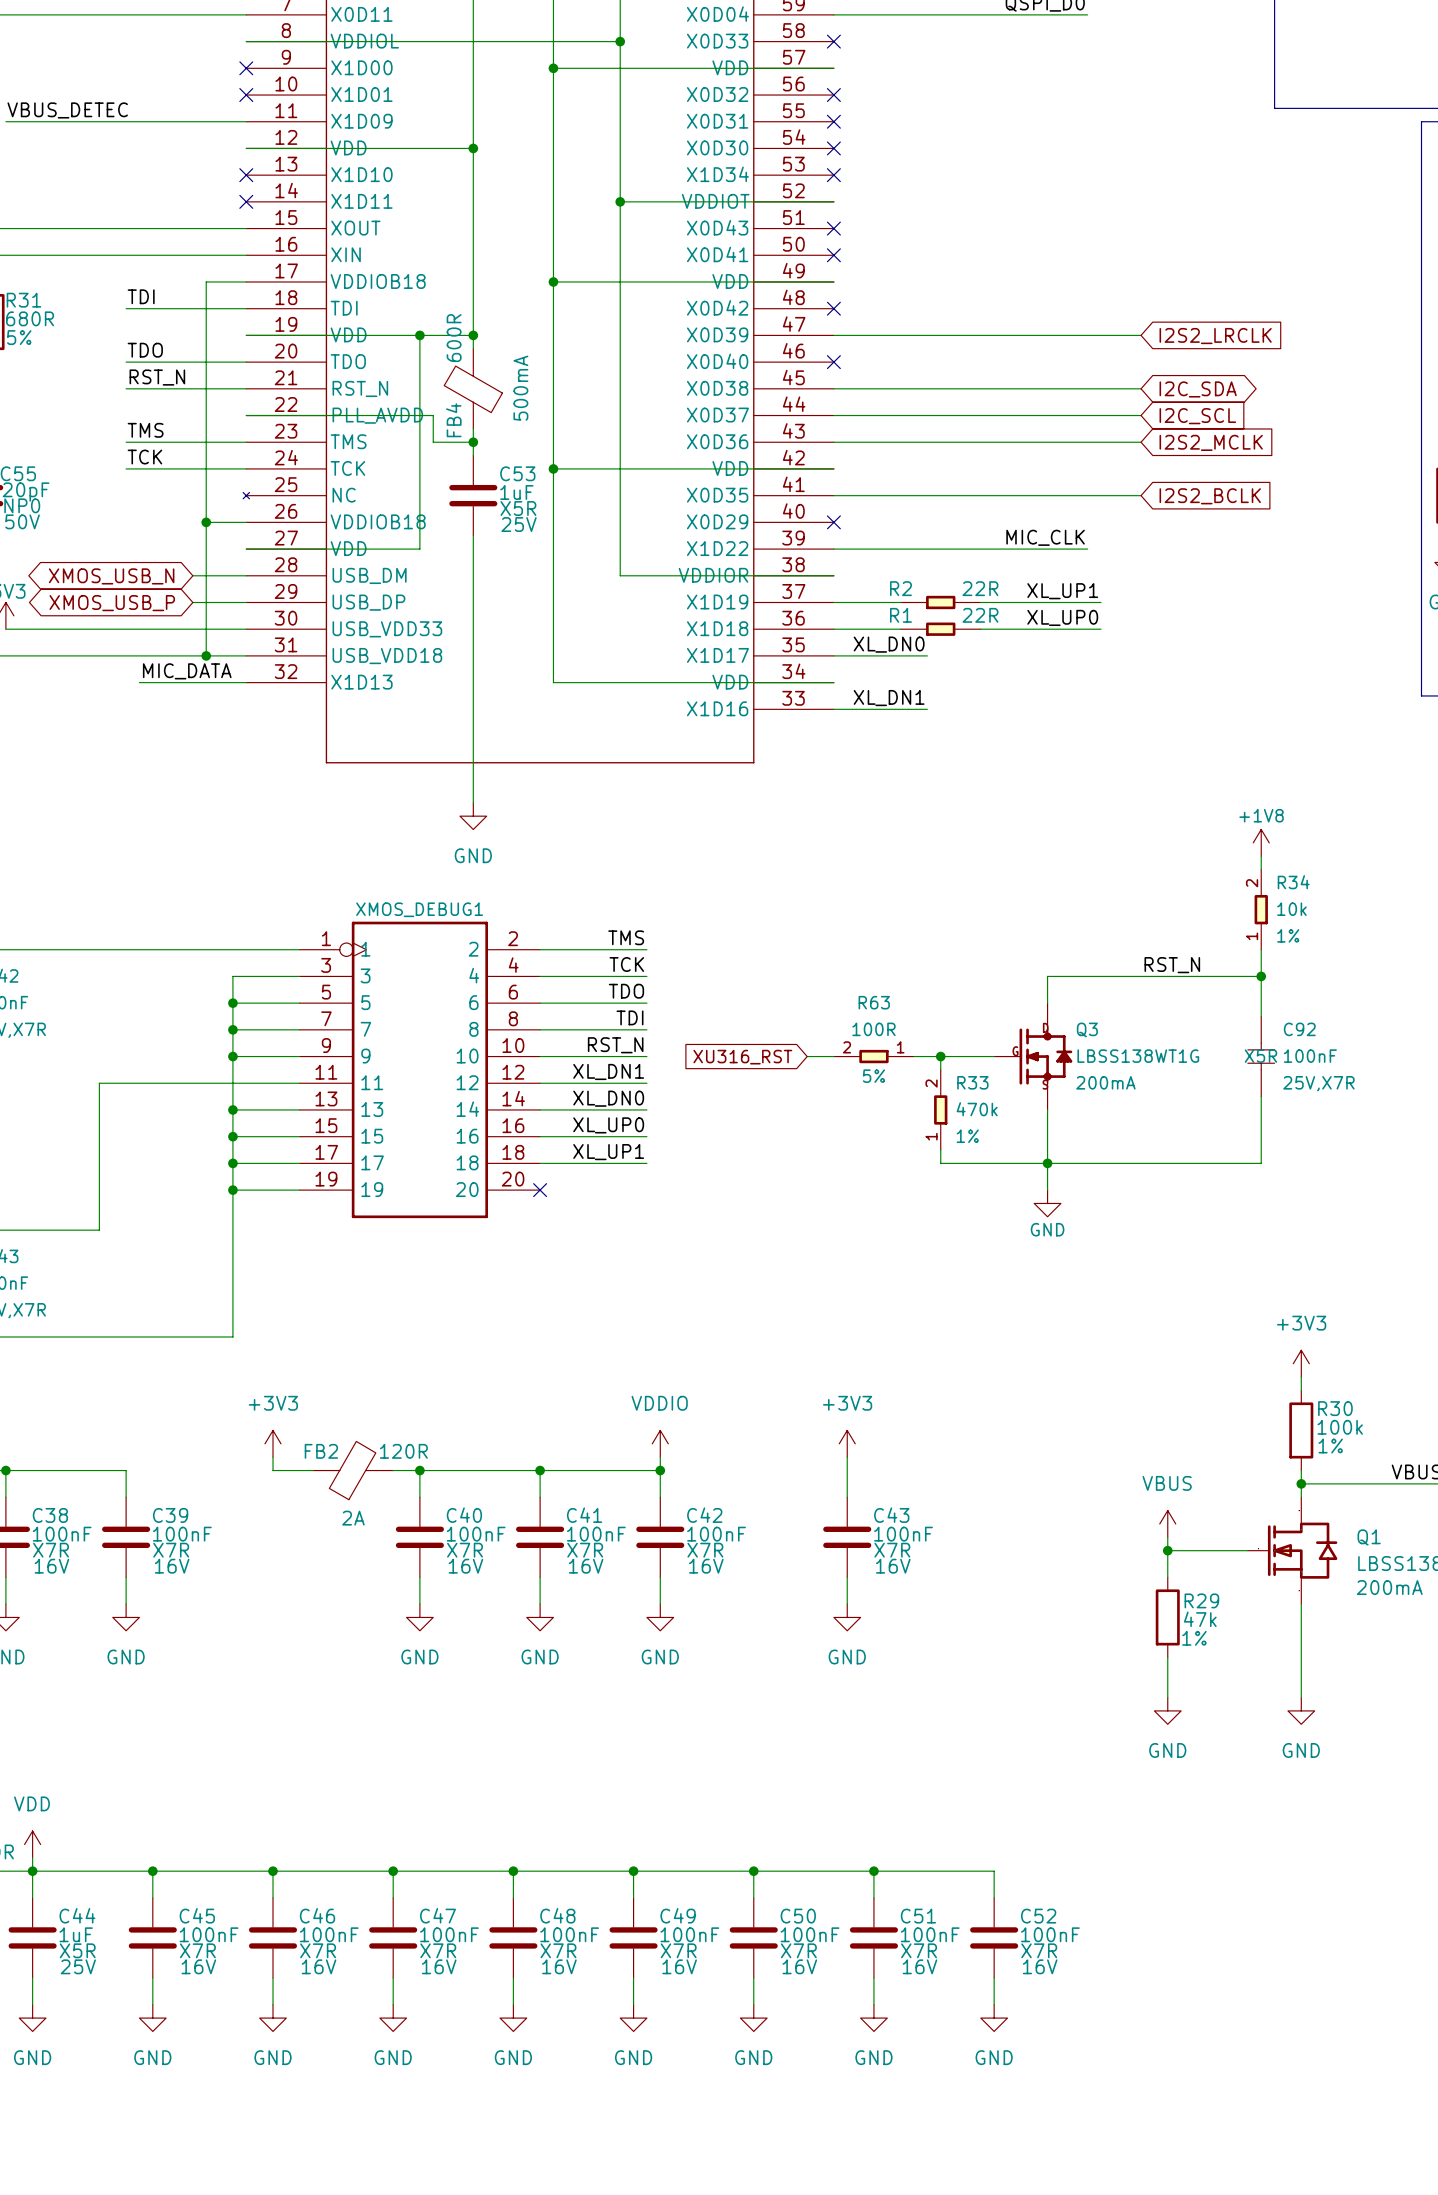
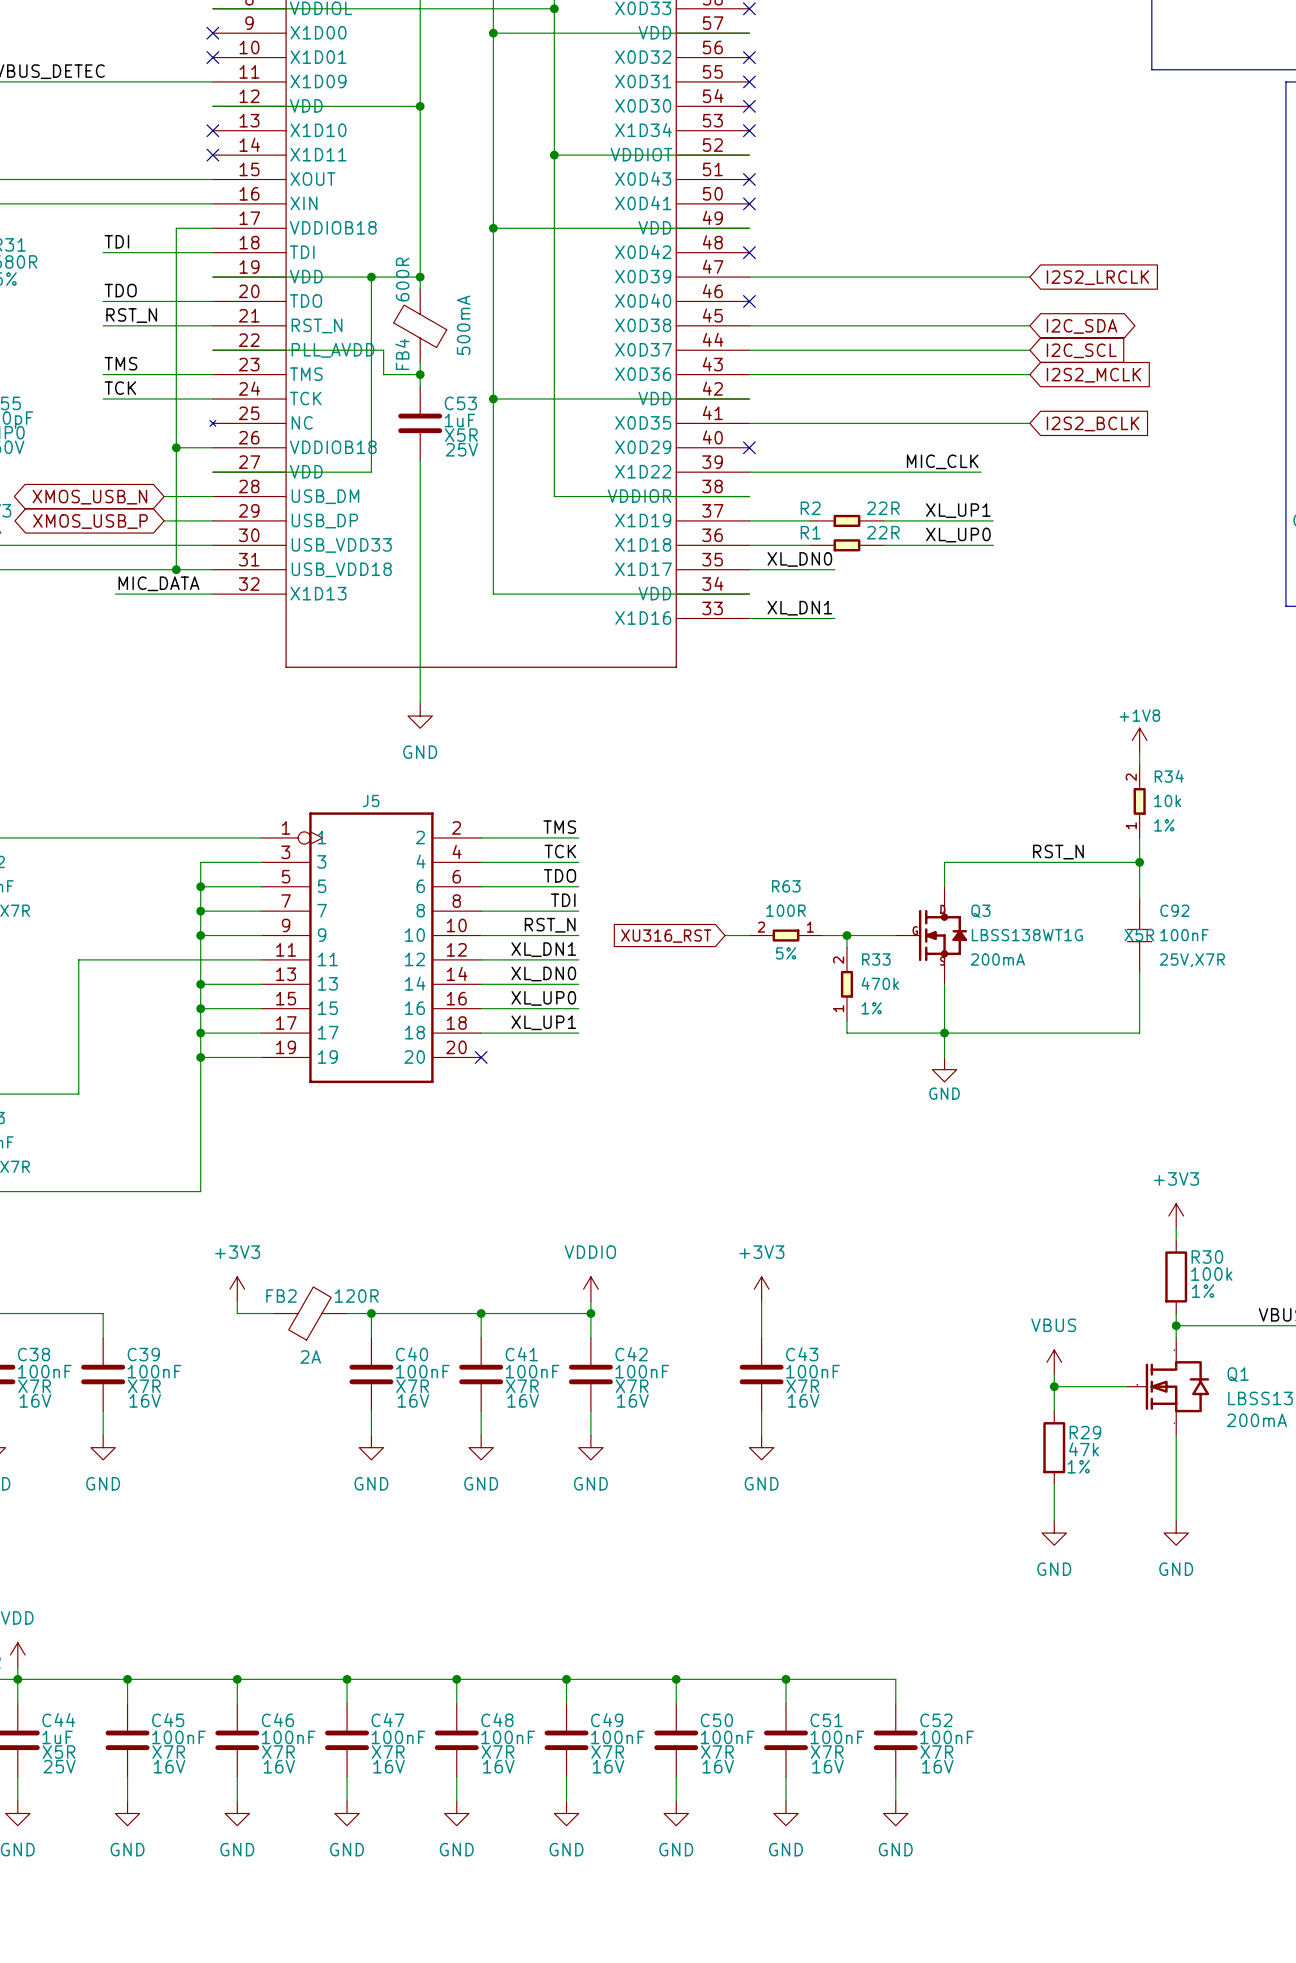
XMOS_DEBUG1 name: XMOS_DEBUG1 (419, 909) -> J5 (371, 800)

